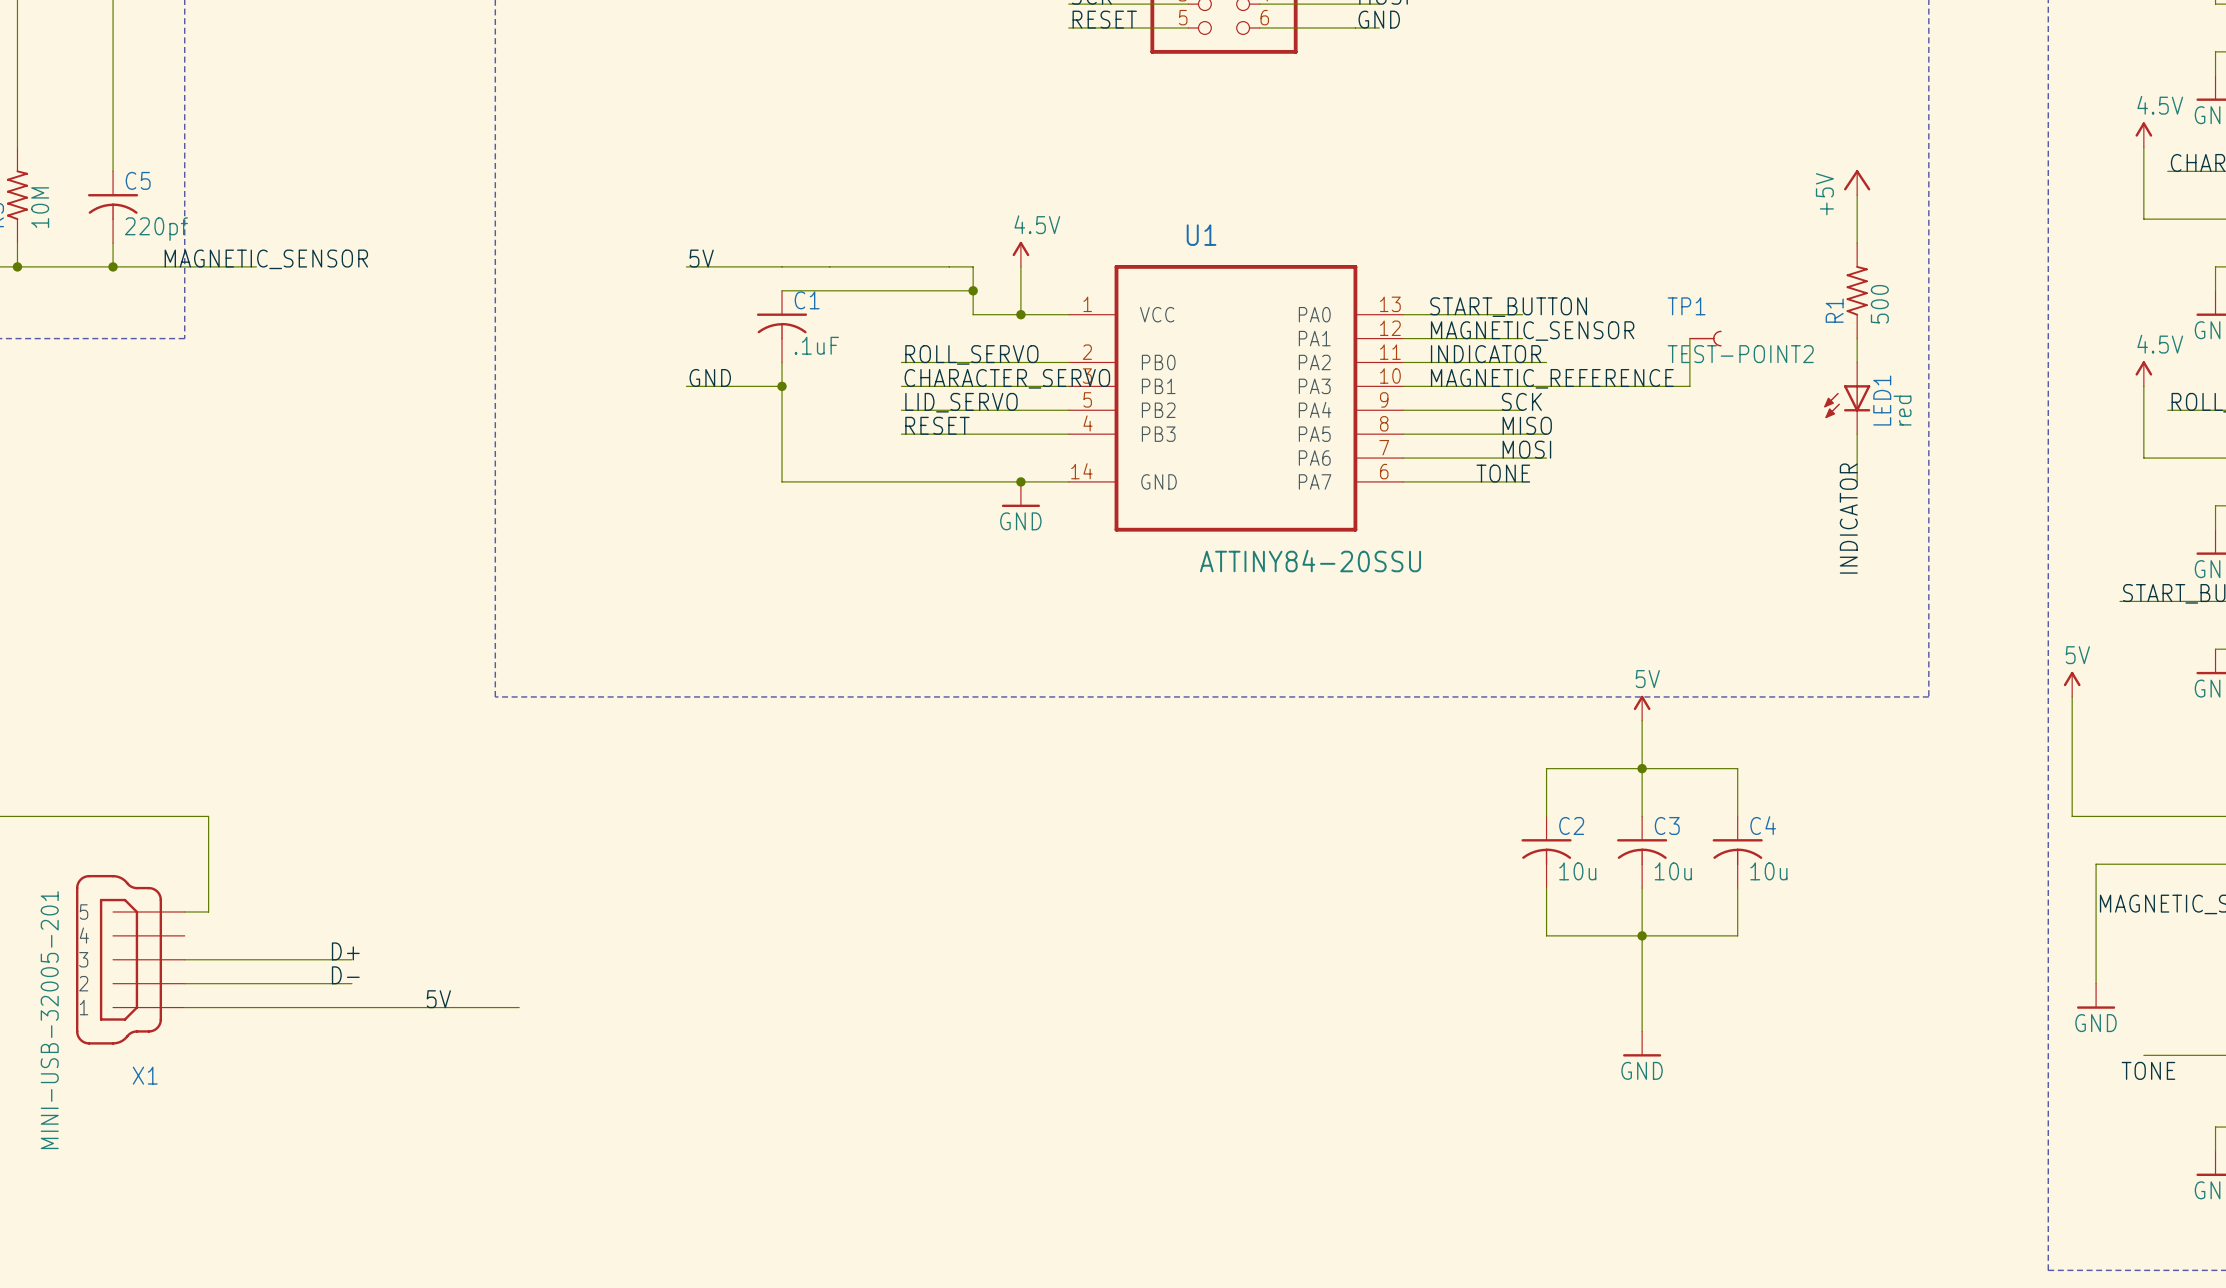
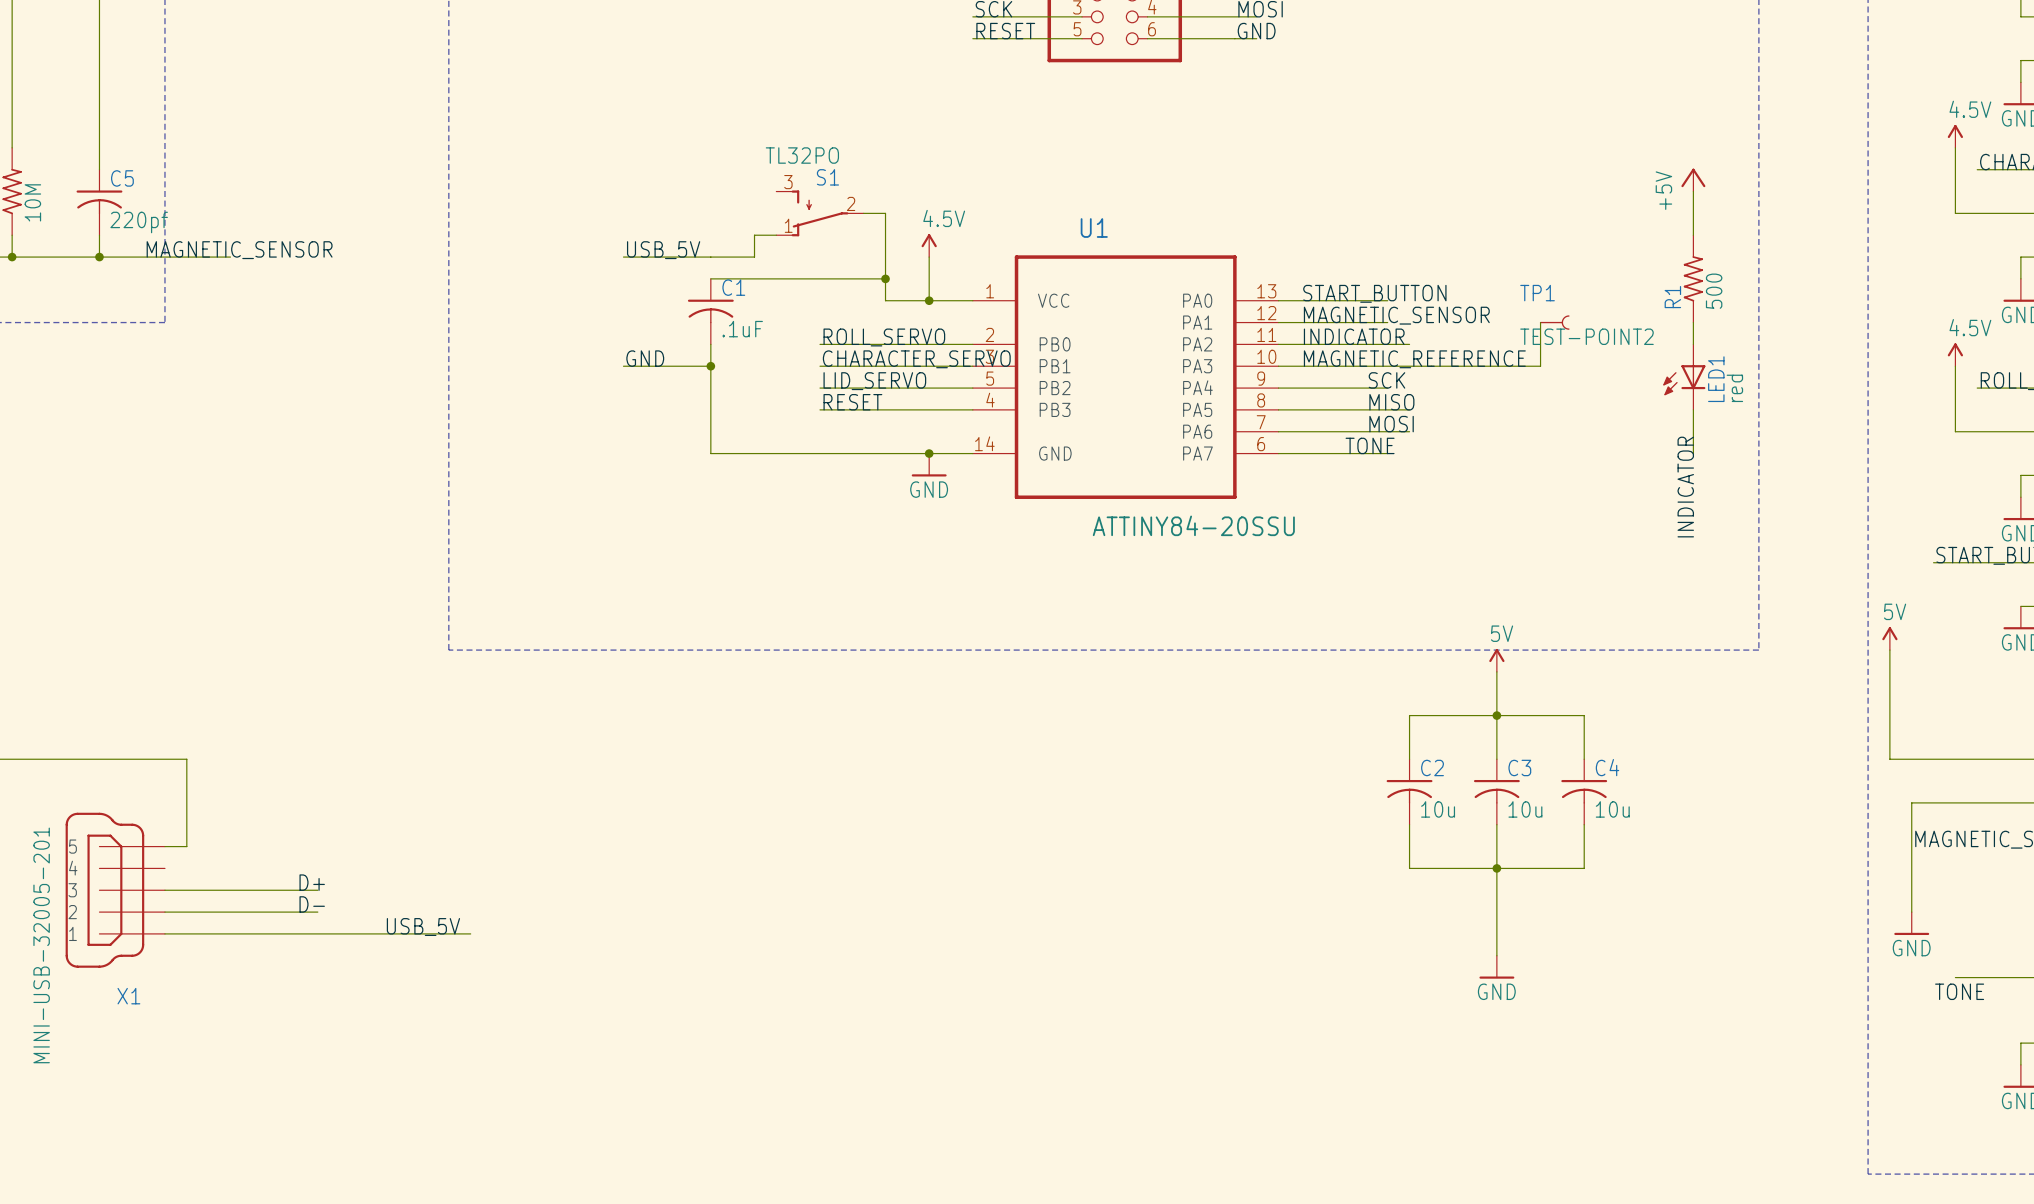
S1: none -> TL32PO (820, 213)
wire: none -> (863, 213) (885, 213) (885, 257)
label: 5V (701, 258) -> USB_5V (663, 250)
wire: (829, 266) (973, 266) -> (754, 257) (754, 235) (776, 235)
label: 5V (438, 999) -> USB_5V (423, 927)

